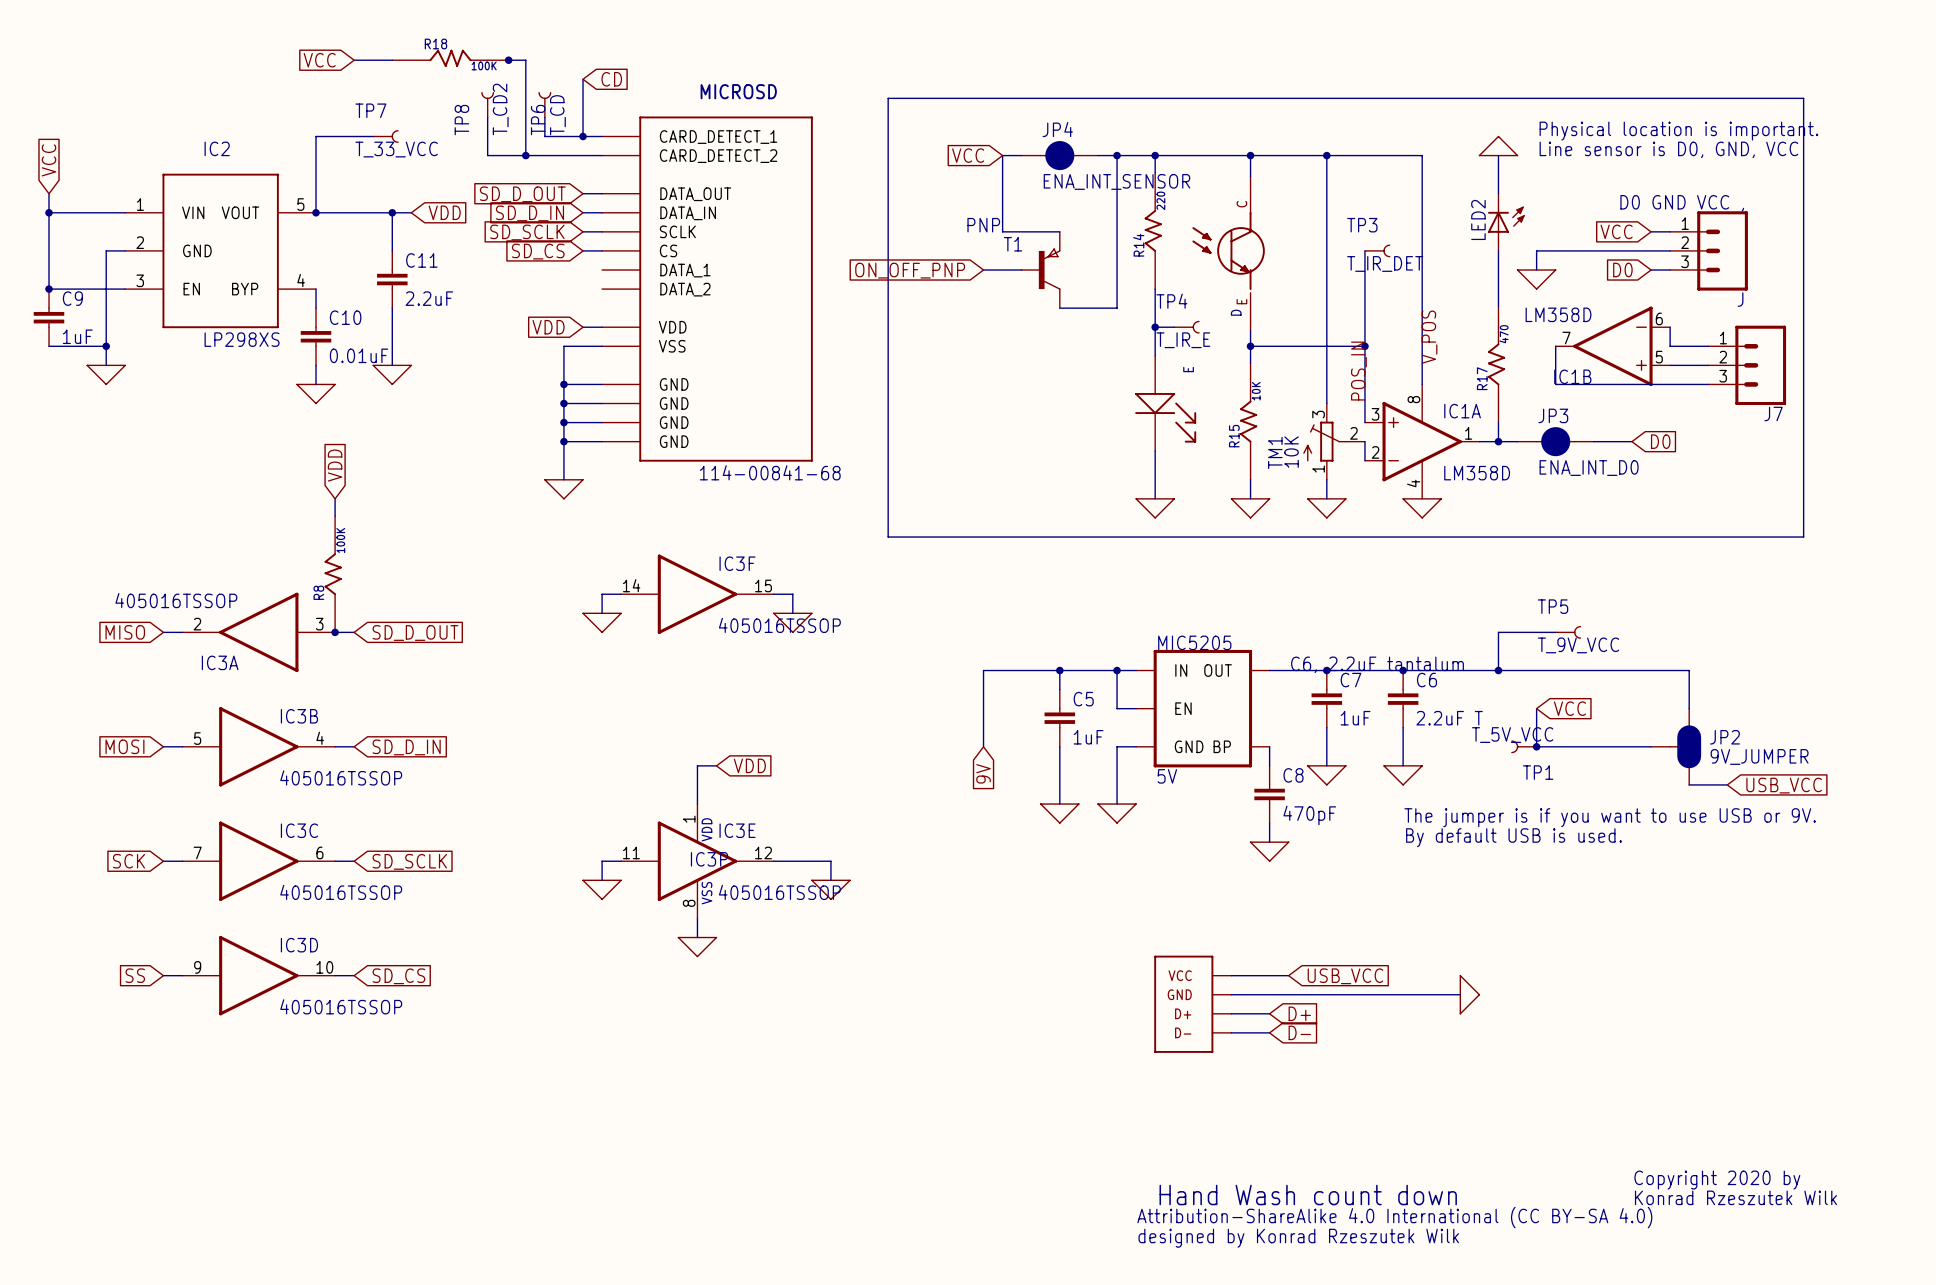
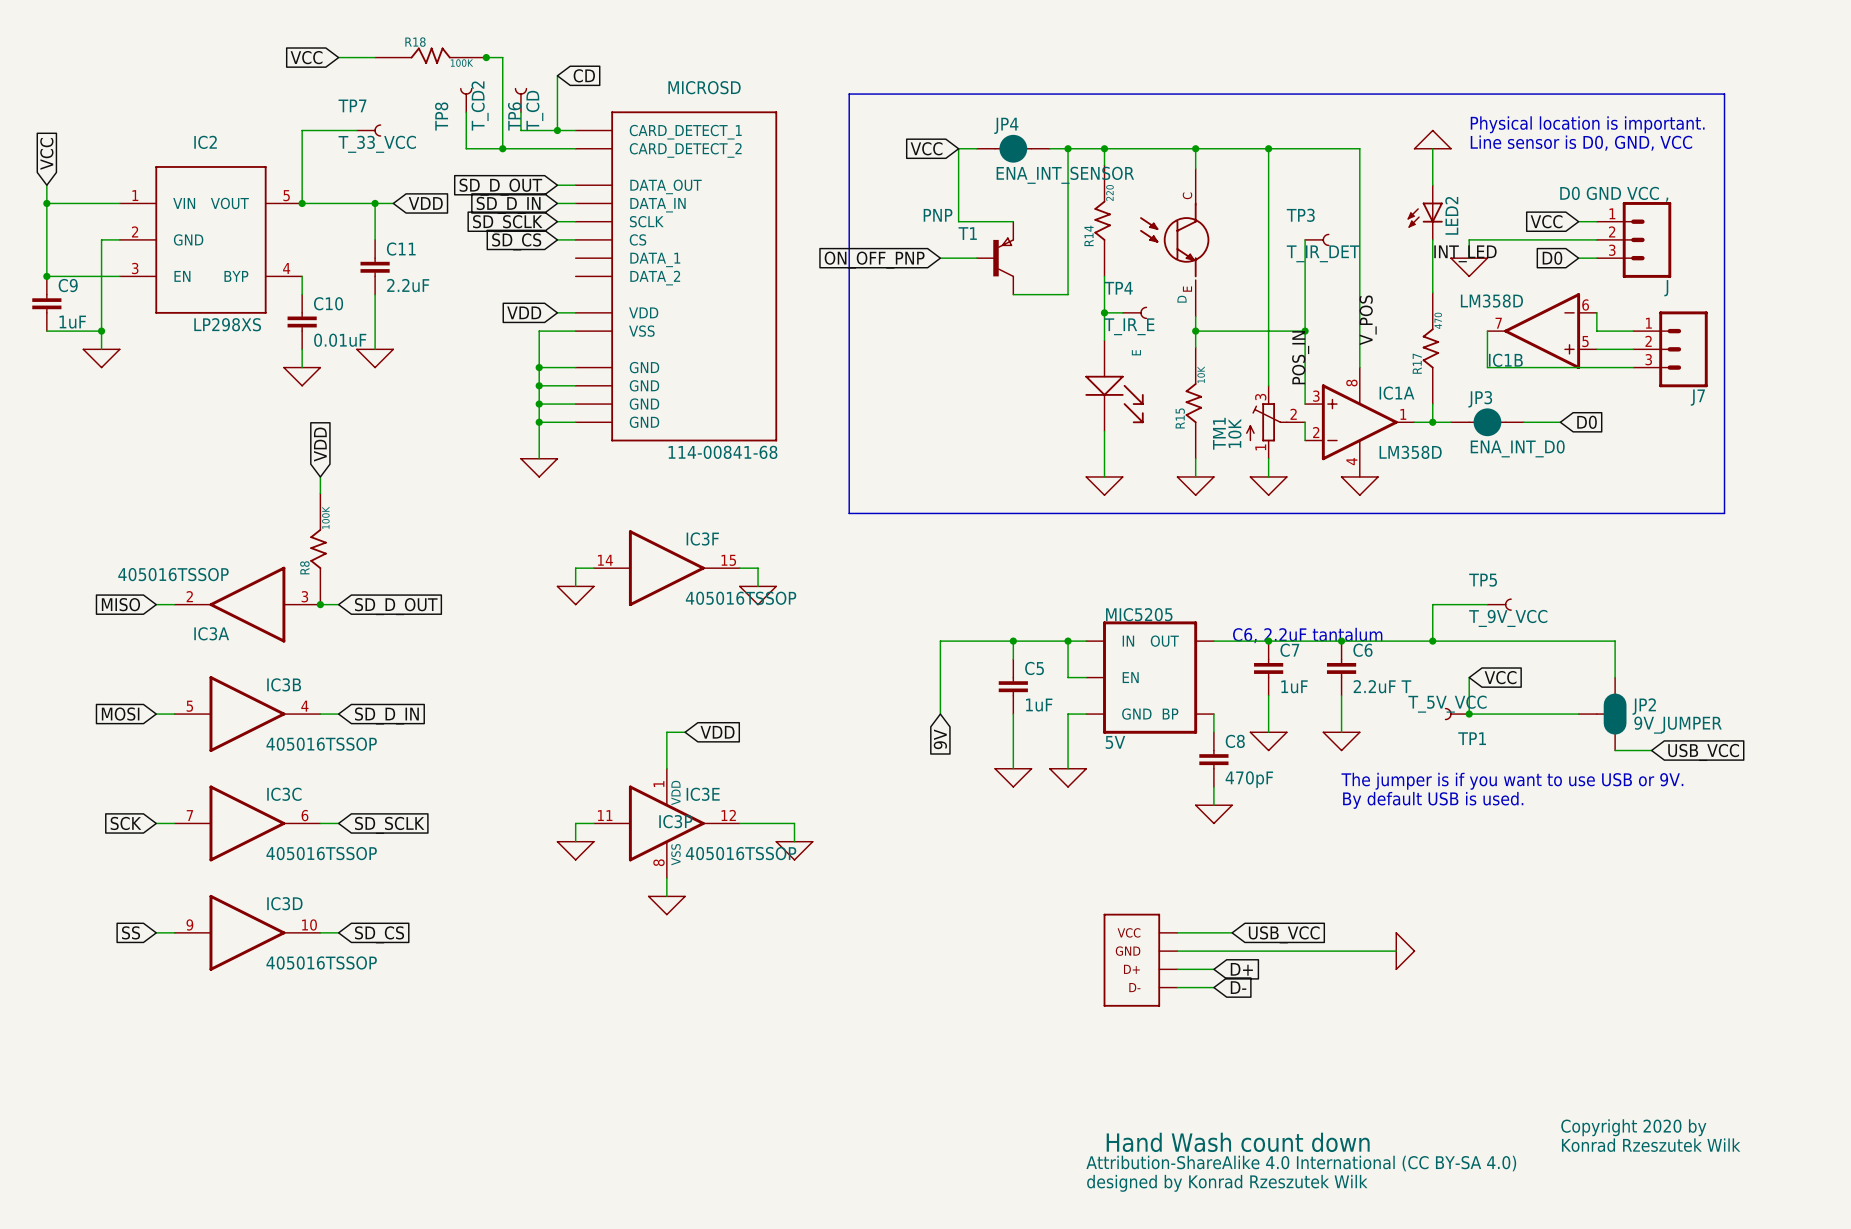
LED2 rotation: 0° (1506, 219) -> 180° (1425, 215)
label: none -> INT_LED (1465, 253)

